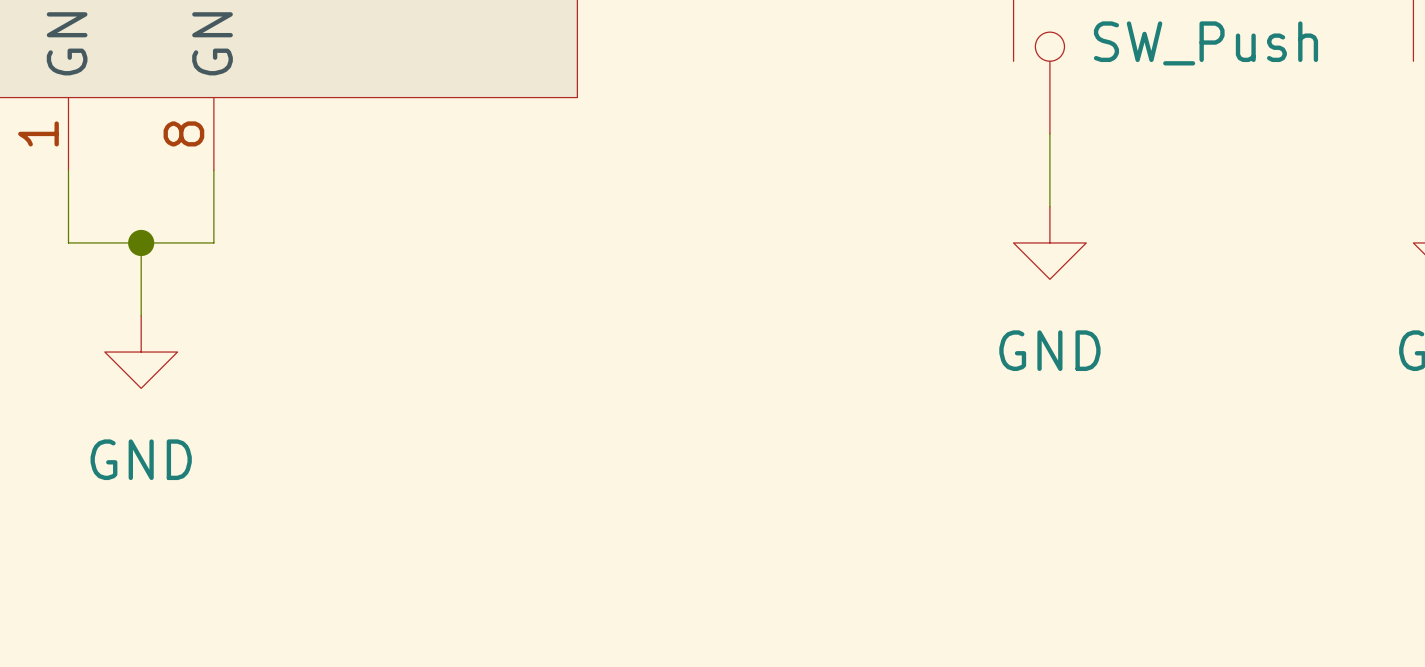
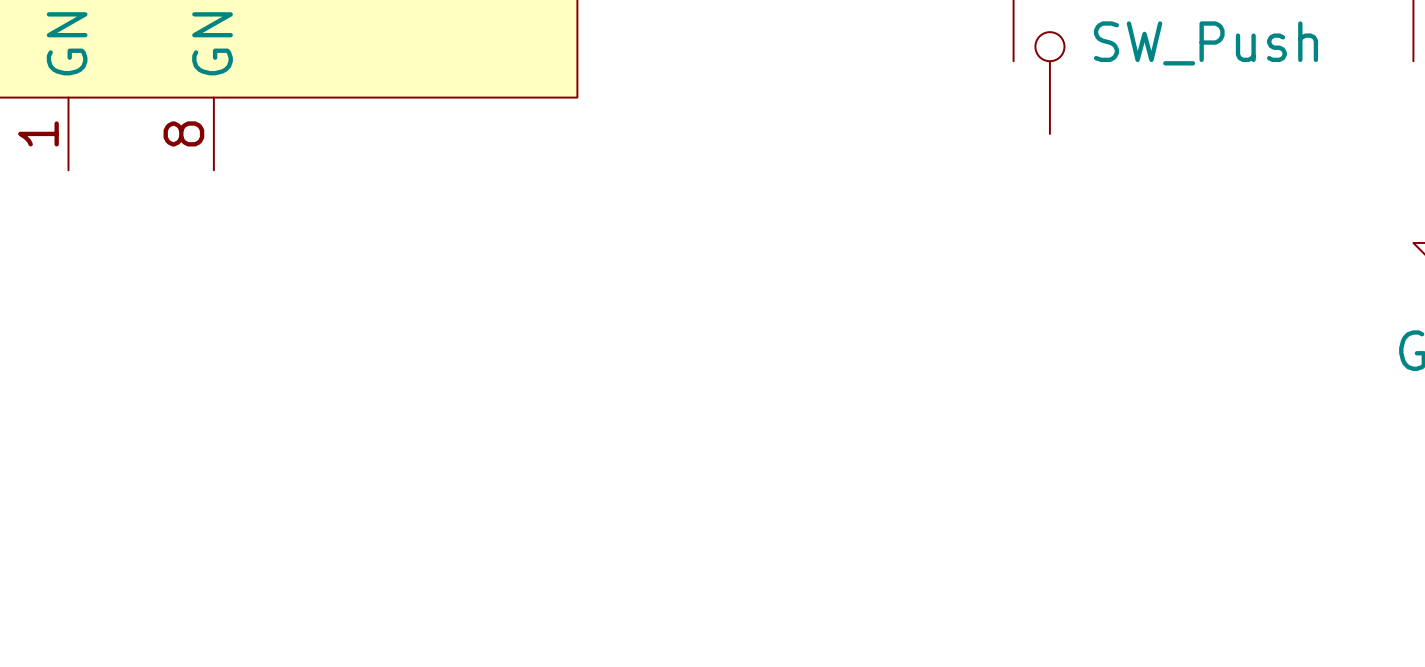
wire: (1049, 133) (1049, 206) -> none
wire: (68, 170) (68, 242) (213, 242) (213, 170) -> none
wire: (141, 242) (141, 315) -> none
junction: (141, 242) -> none
power symbol: GND (1049, 242) -> none
power symbol: GND (141, 352) -> none

